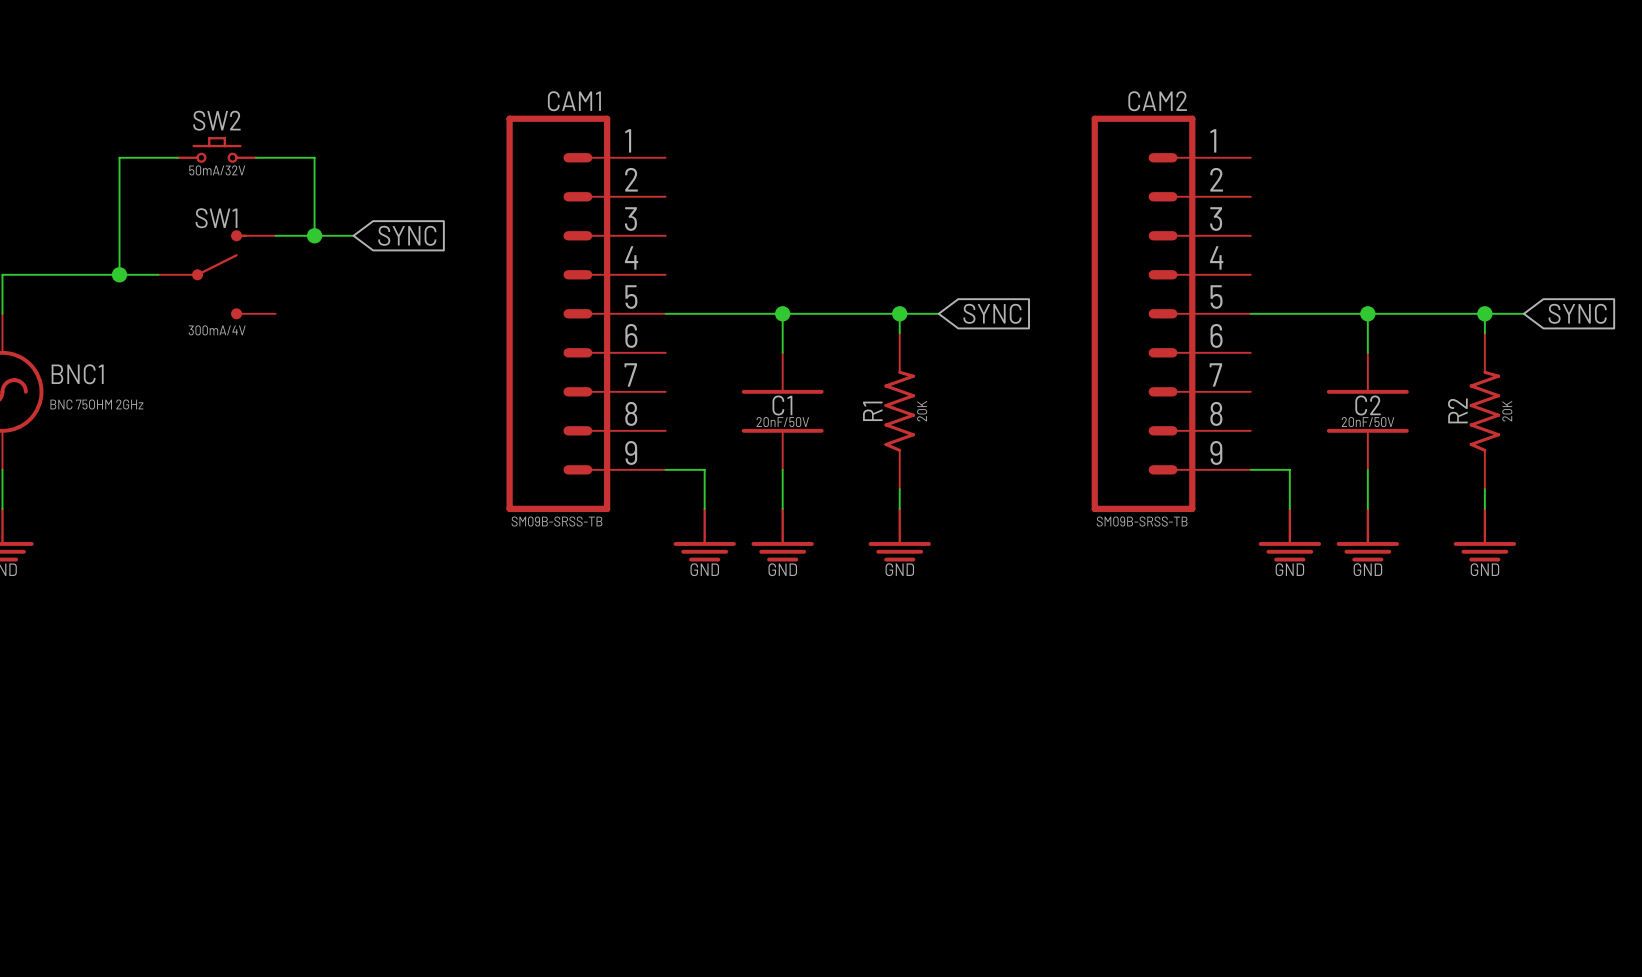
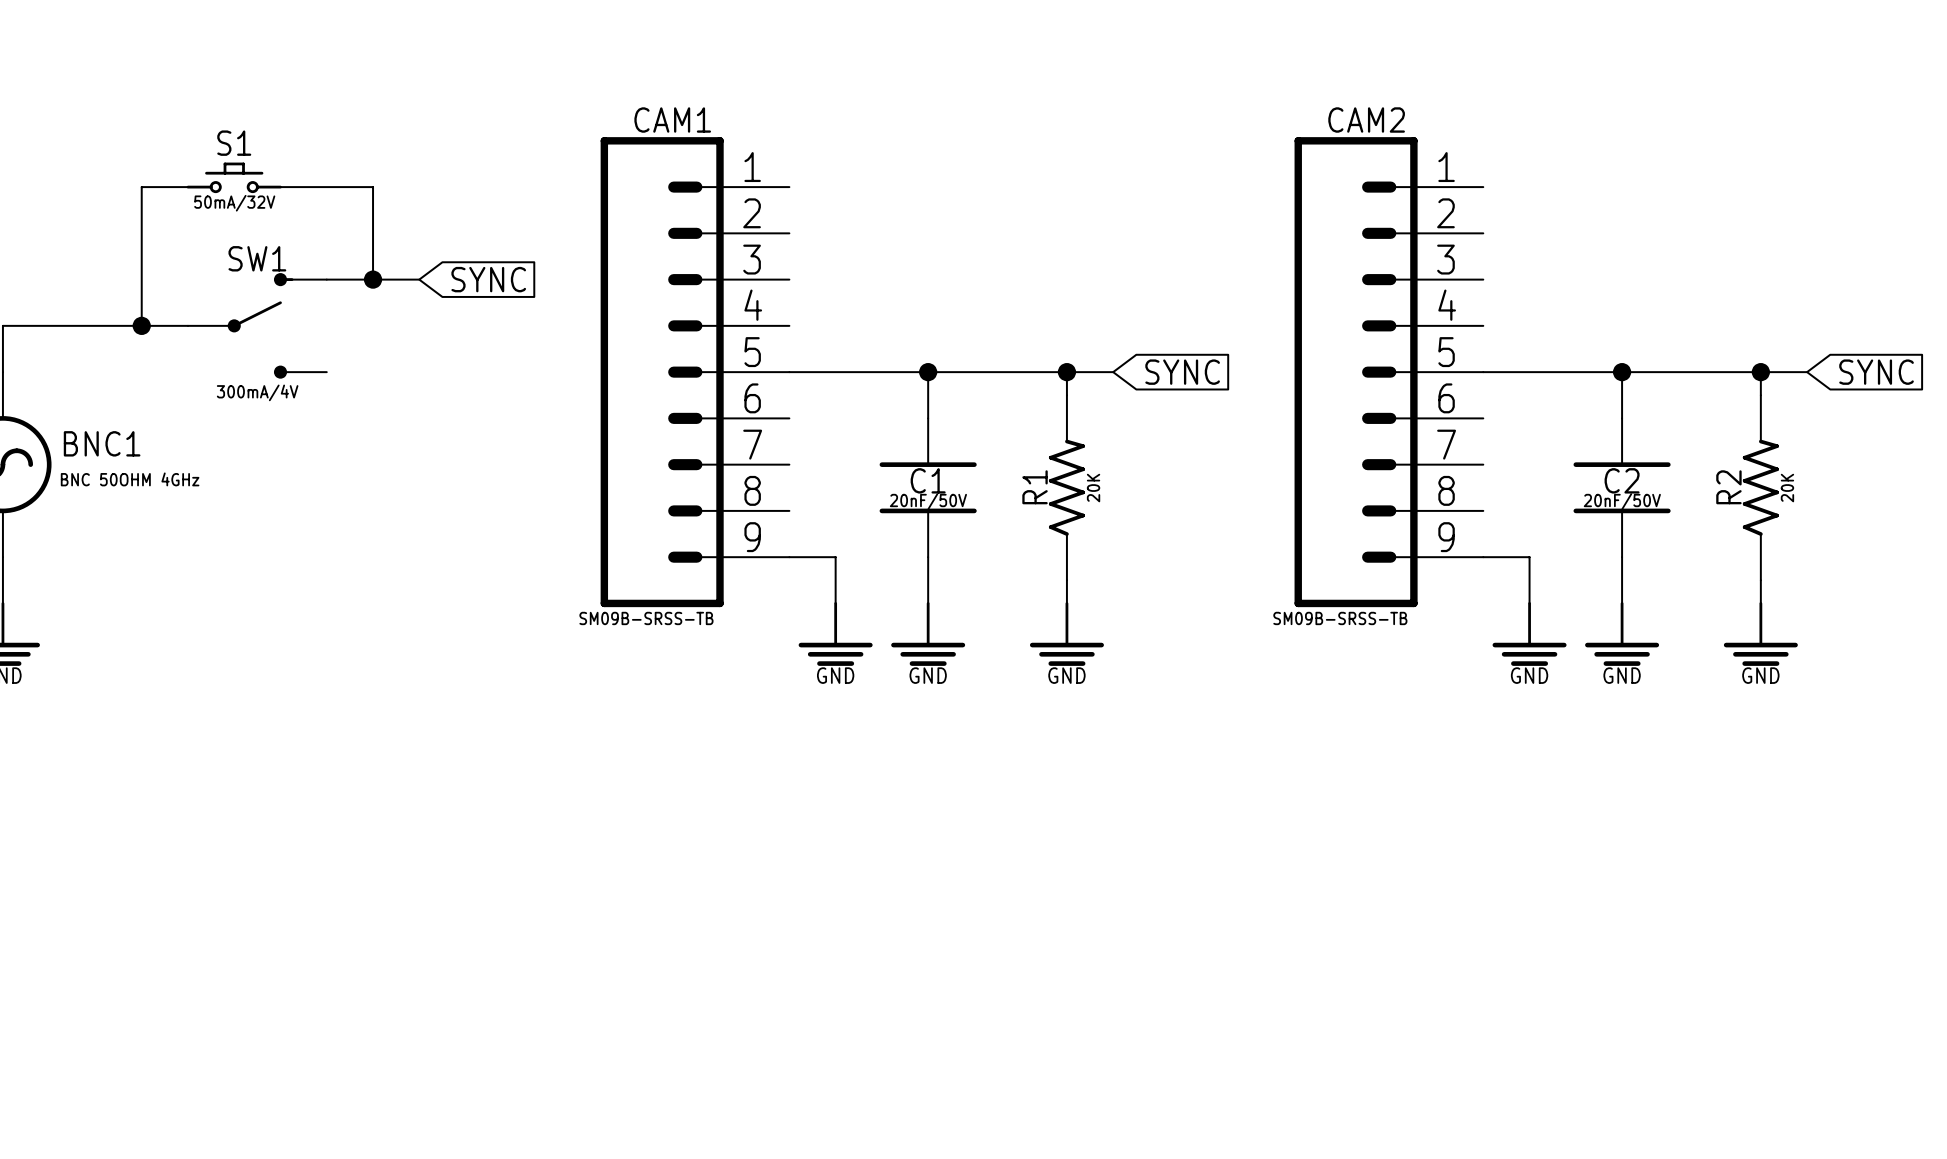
S1: none -> 50mA/32V (234, 177)
SW2: 50mA/32V (217, 149) -> none
BNC1 value: BNC 75OHM 2GHz (96, 404) -> BNC 50OHM 4GHz (130, 479)

